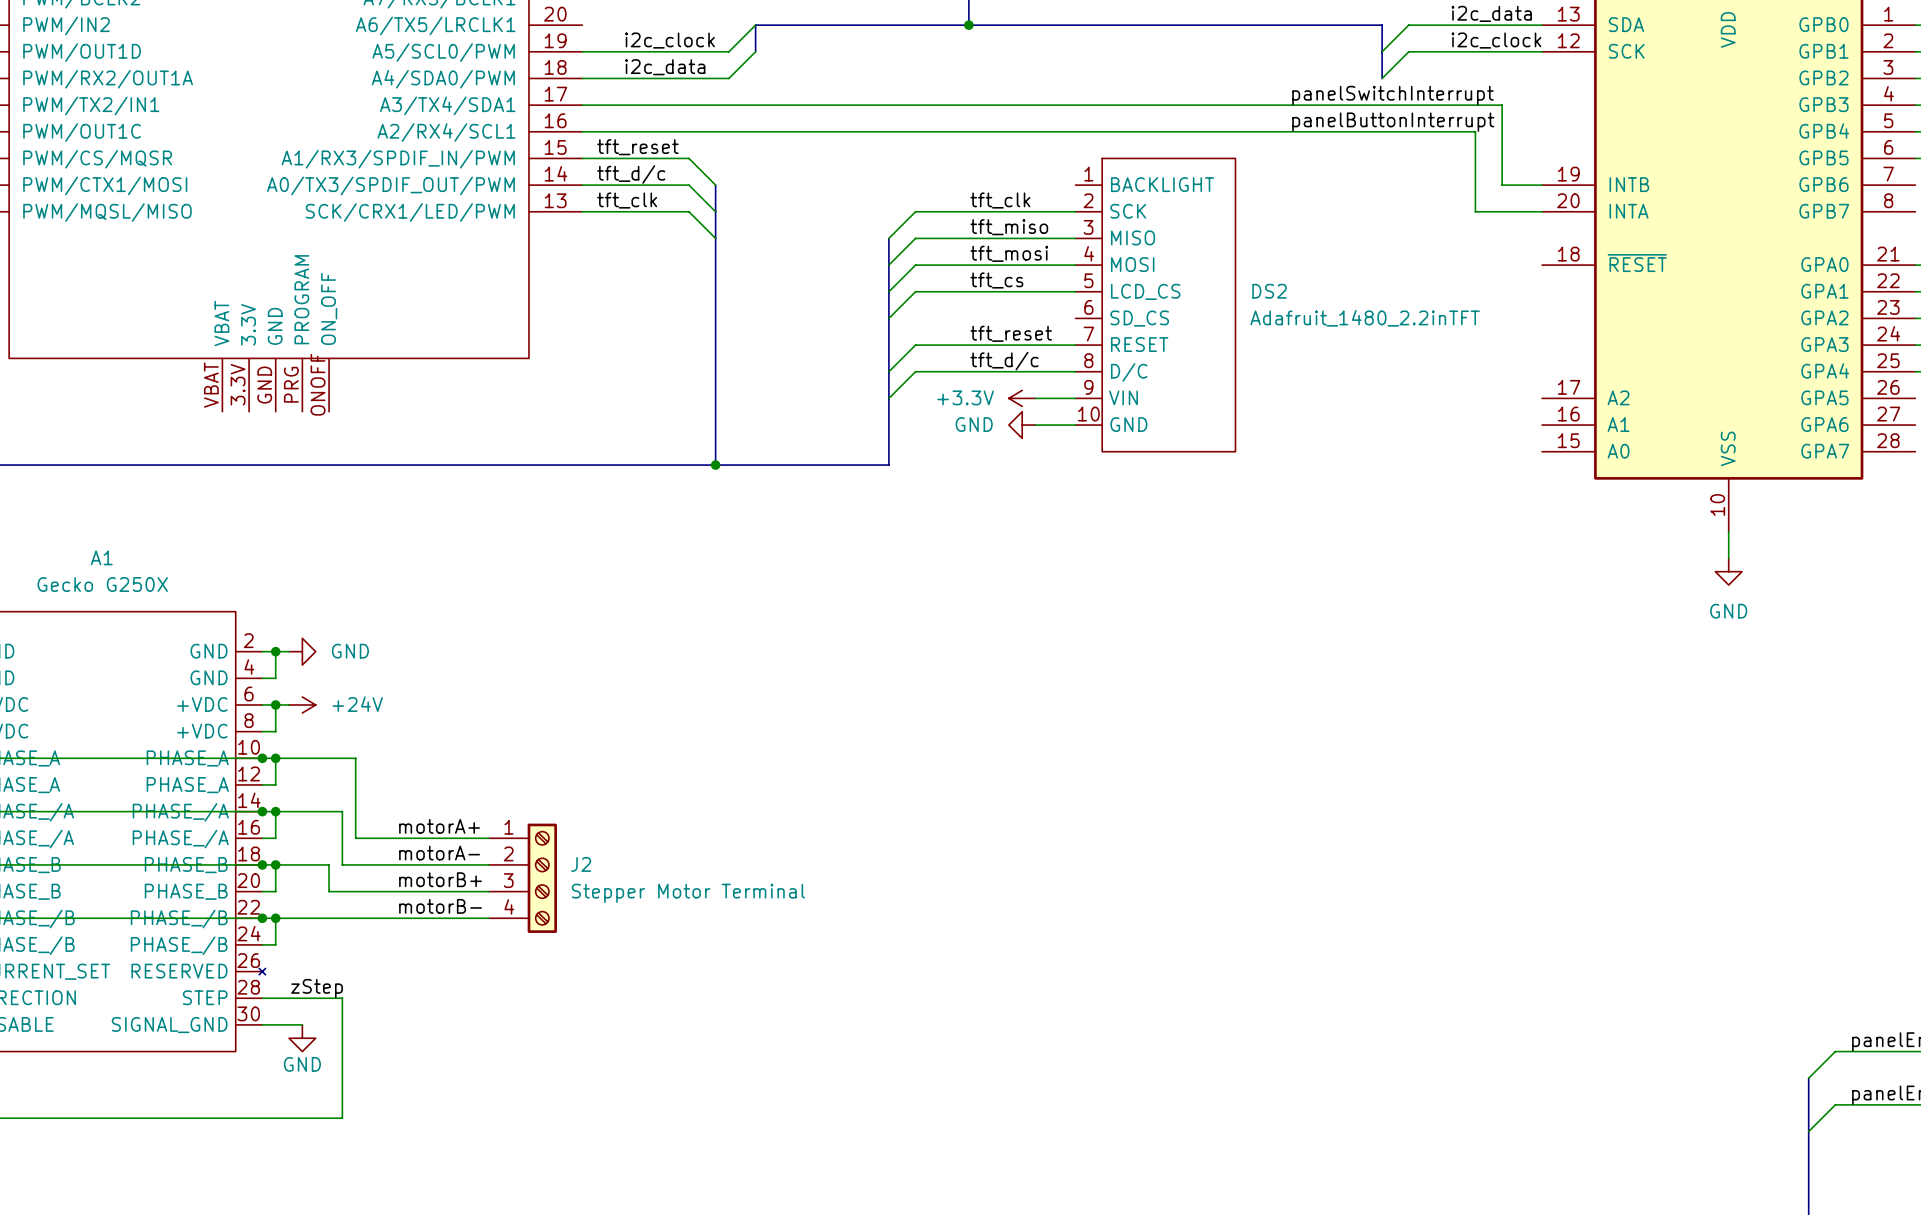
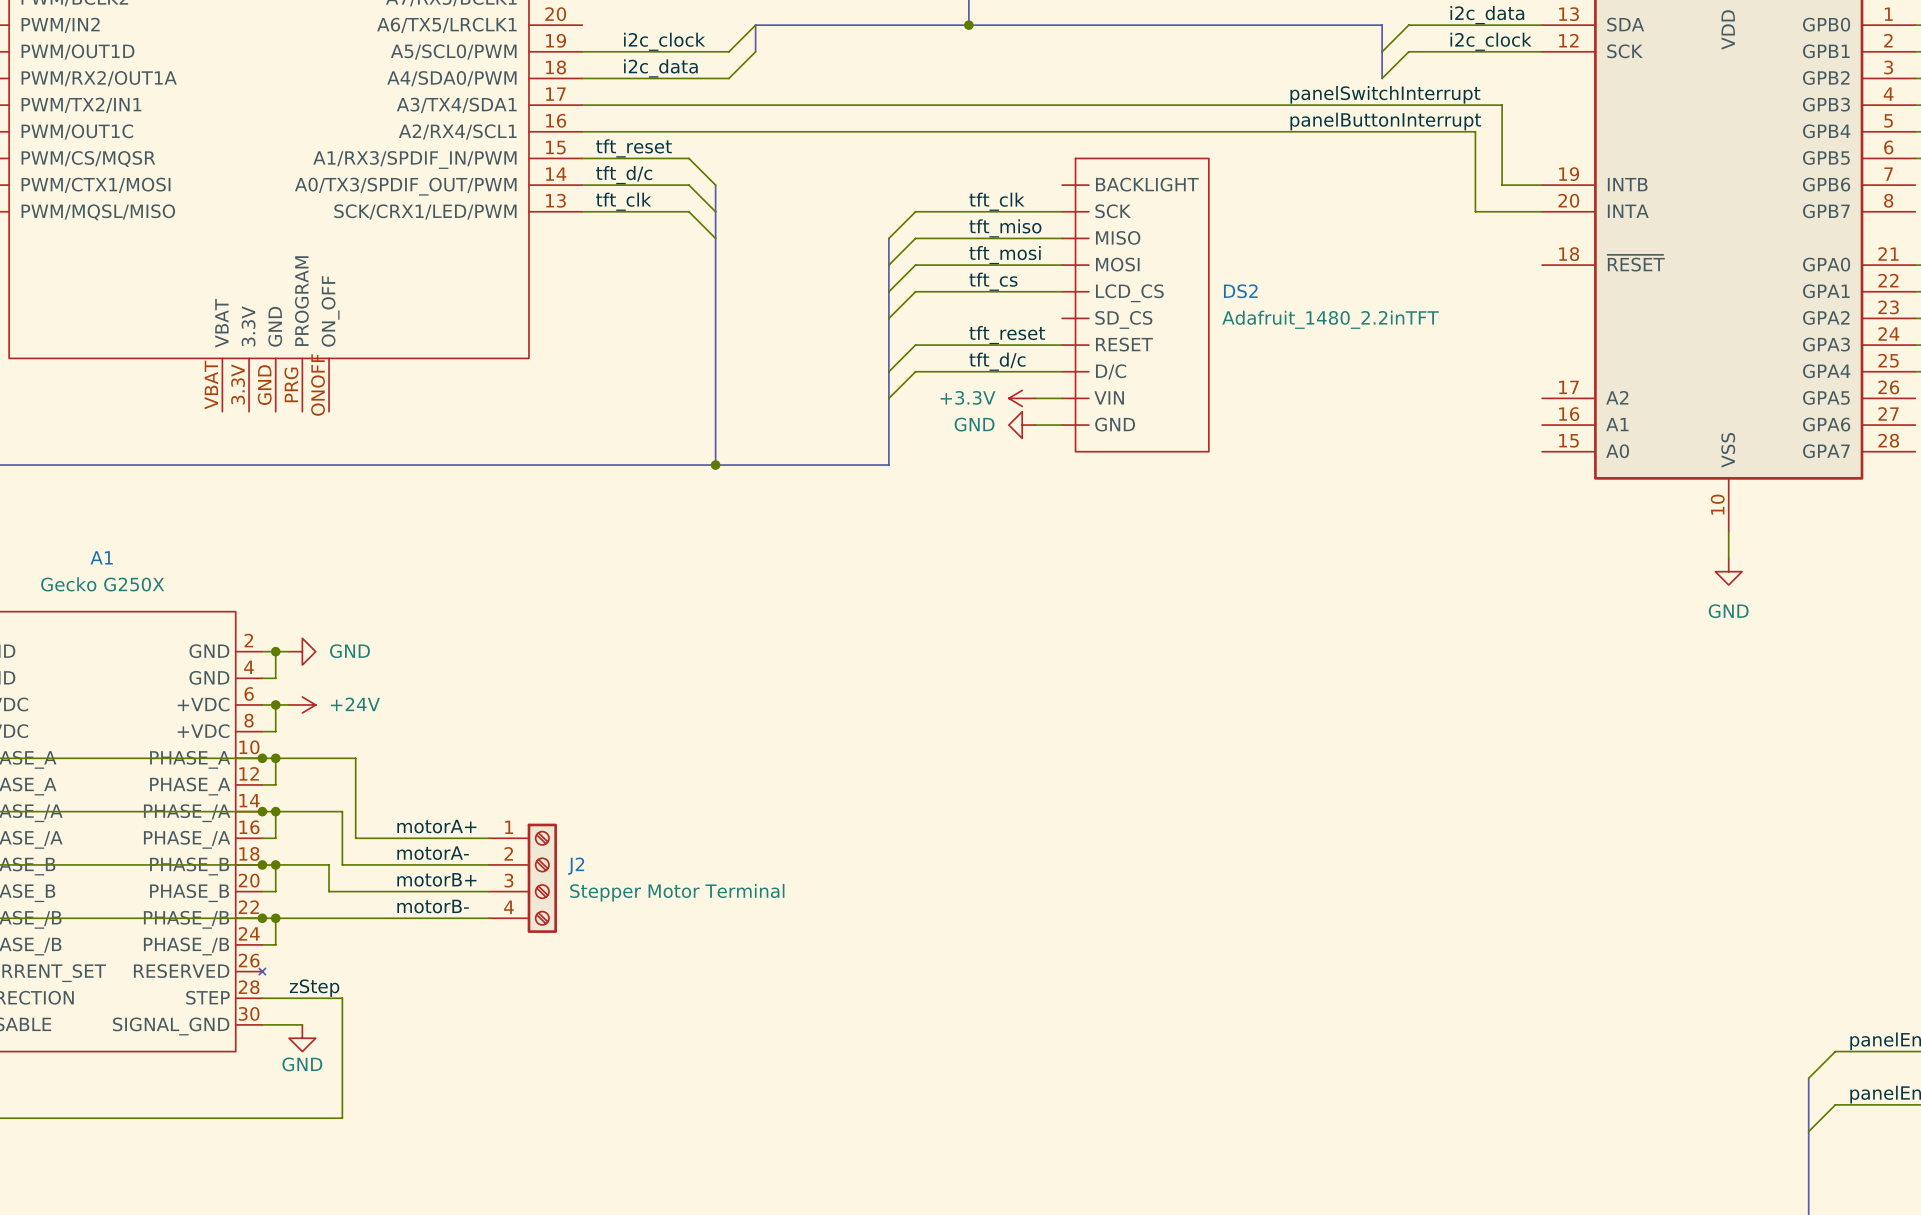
DS2 symbol: [1075, 158, 1236, 452] -> [1062, 158, 1209, 452]

